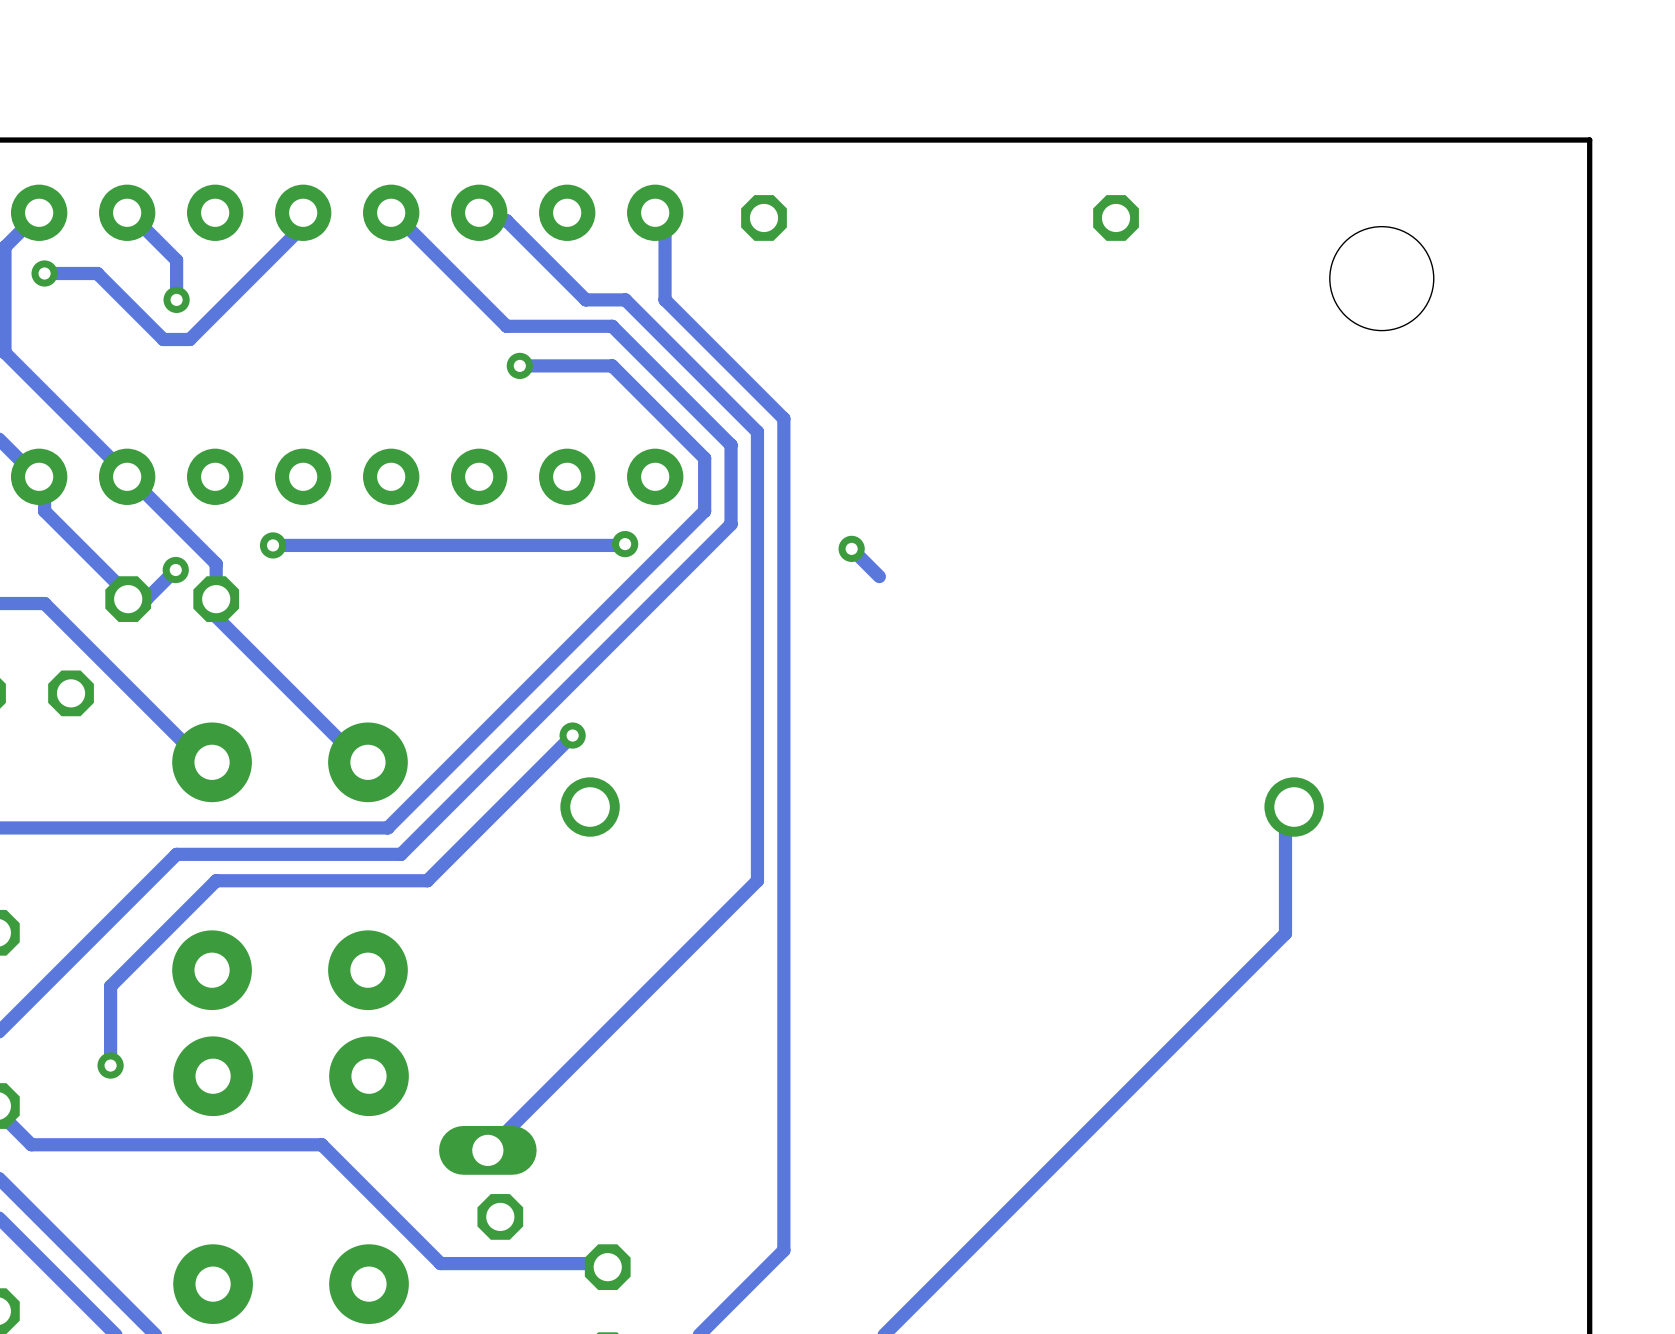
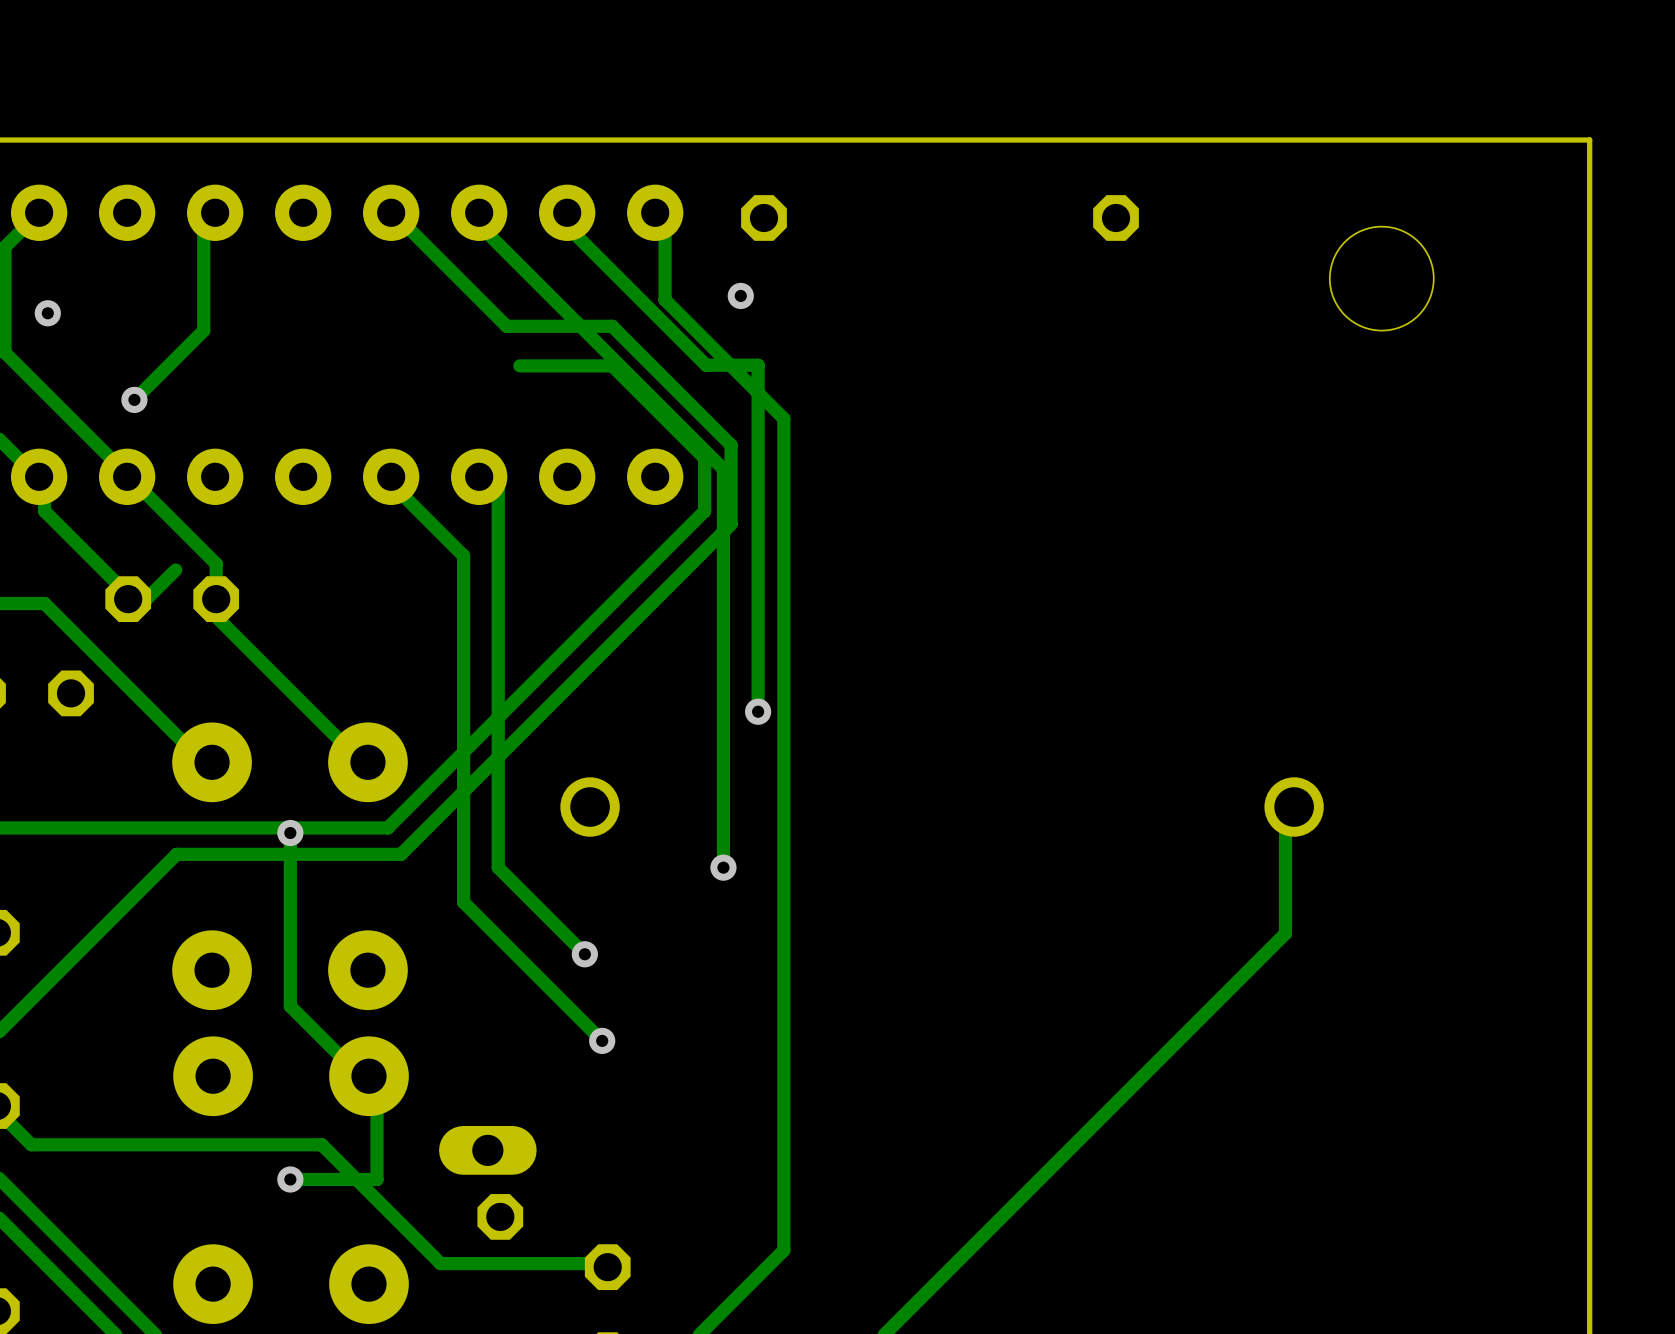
track: (127, 212) (176, 260) (176, 299) -> none
track: none -> (215, 212) (203, 226) (203, 330) (134, 399)
track: (303, 212) (308, 220) (189, 339) (163, 339) (97, 273) (44, 273) -> none
track: (479, 212) (480, 220) (506, 220) (585, 299) (625, 299) (757, 431) (757, 880) (487, 1150) -> (479, 212) (480, 226) (723, 469) (723, 867)
track: none -> (567, 212) (567, 226) (706, 365) (758, 365) (758, 711)
via position: (44, 273) -> (47, 313)
via: none -> (740, 295)
via: (176, 299) -> none
via: (519, 365) -> none
via: none -> (134, 399)
track: none -> (391, 476) (394, 486) (463, 555) (463, 902) (602, 1040)
track: none -> (479, 476) (480, 469) (498, 486) (498, 867) (584, 954)
track: (625, 544) (273, 545) -> none
via: (625, 544) -> none
via: (273, 545) -> none
track: (851, 548) (879, 576) -> none
via: (851, 548) -> none
via: (175, 570) -> none
via: none -> (758, 711)
track: (572, 735) (427, 880) (216, 880) (110, 986) (110, 1065) -> none
via: (572, 735) -> none
track: none -> (290, 833) (290, 1006) (359, 1075) (369, 1076) (376, 1092) (376, 1179) (290, 1179)
via: none -> (290, 833)
via: none -> (723, 867)
via: none -> (584, 954)
via: none -> (602, 1040)
via: (110, 1065) -> none
via: none -> (290, 1179)

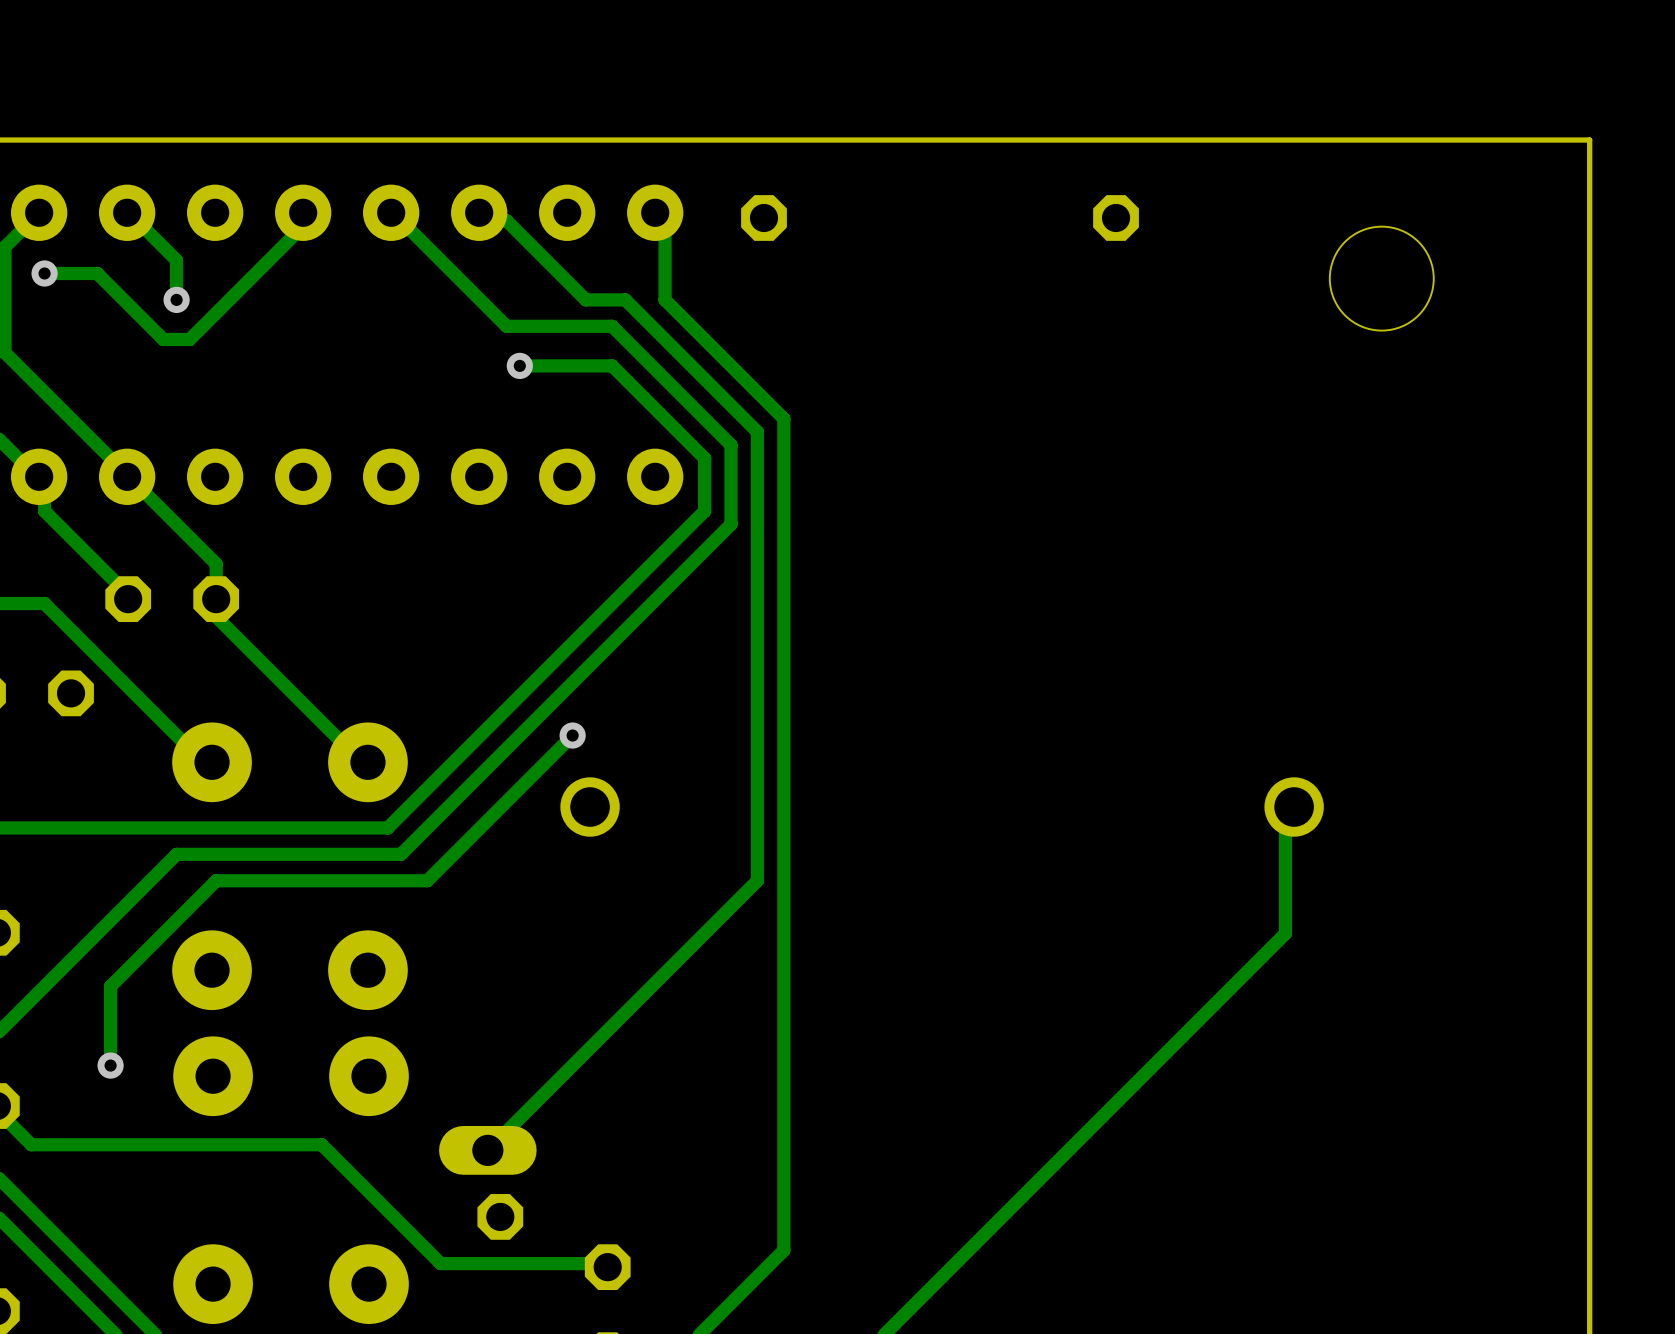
track: none -> (127, 212) (176, 260) (176, 299)
track: (215, 212) (203, 226) (203, 330) (134, 399) -> none
track: none -> (303, 212) (308, 220) (189, 339) (163, 339) (97, 273) (44, 273)
track: (479, 212) (480, 226) (723, 469) (723, 867) -> (479, 212) (480, 220) (506, 220) (585, 299) (625, 299) (757, 431) (757, 880) (487, 1150)
track: (567, 212) (567, 226) (706, 365) (758, 365) (758, 711) -> none
via: (740, 295) -> none
via: none -> (176, 299)
via position: (47, 313) -> (44, 273)
via: none -> (519, 365)
via: (134, 399) -> none
track: (391, 476) (394, 486) (463, 555) (463, 902) (602, 1040) -> none
track: (479, 476) (480, 469) (498, 486) (498, 867) (584, 954) -> none
track: (175, 570) (146, 599) (128, 599) -> none
via: (758, 711) -> none
track: none -> (572, 735) (427, 880) (216, 880) (110, 986) (110, 1065)
via: none -> (572, 735)
track: (290, 833) (290, 1006) (359, 1075) (369, 1076) (376, 1092) (376, 1179) (290, 1179) -> none
via: (290, 833) -> none
via: (723, 867) -> none
via: (584, 954) -> none
via: (602, 1040) -> none
via: none -> (110, 1065)
via: (290, 1179) -> none

